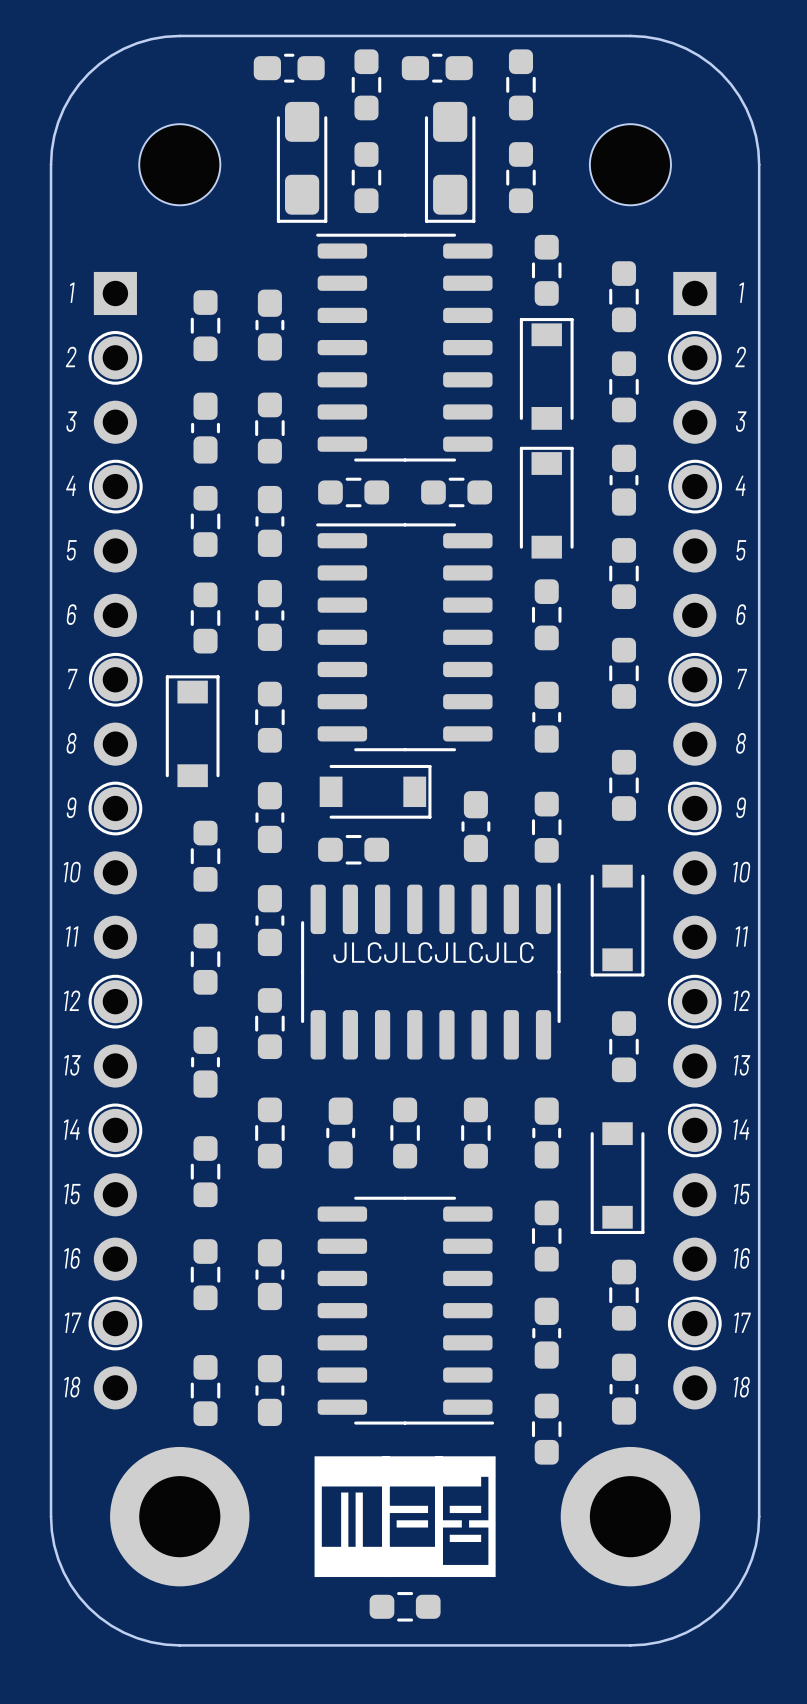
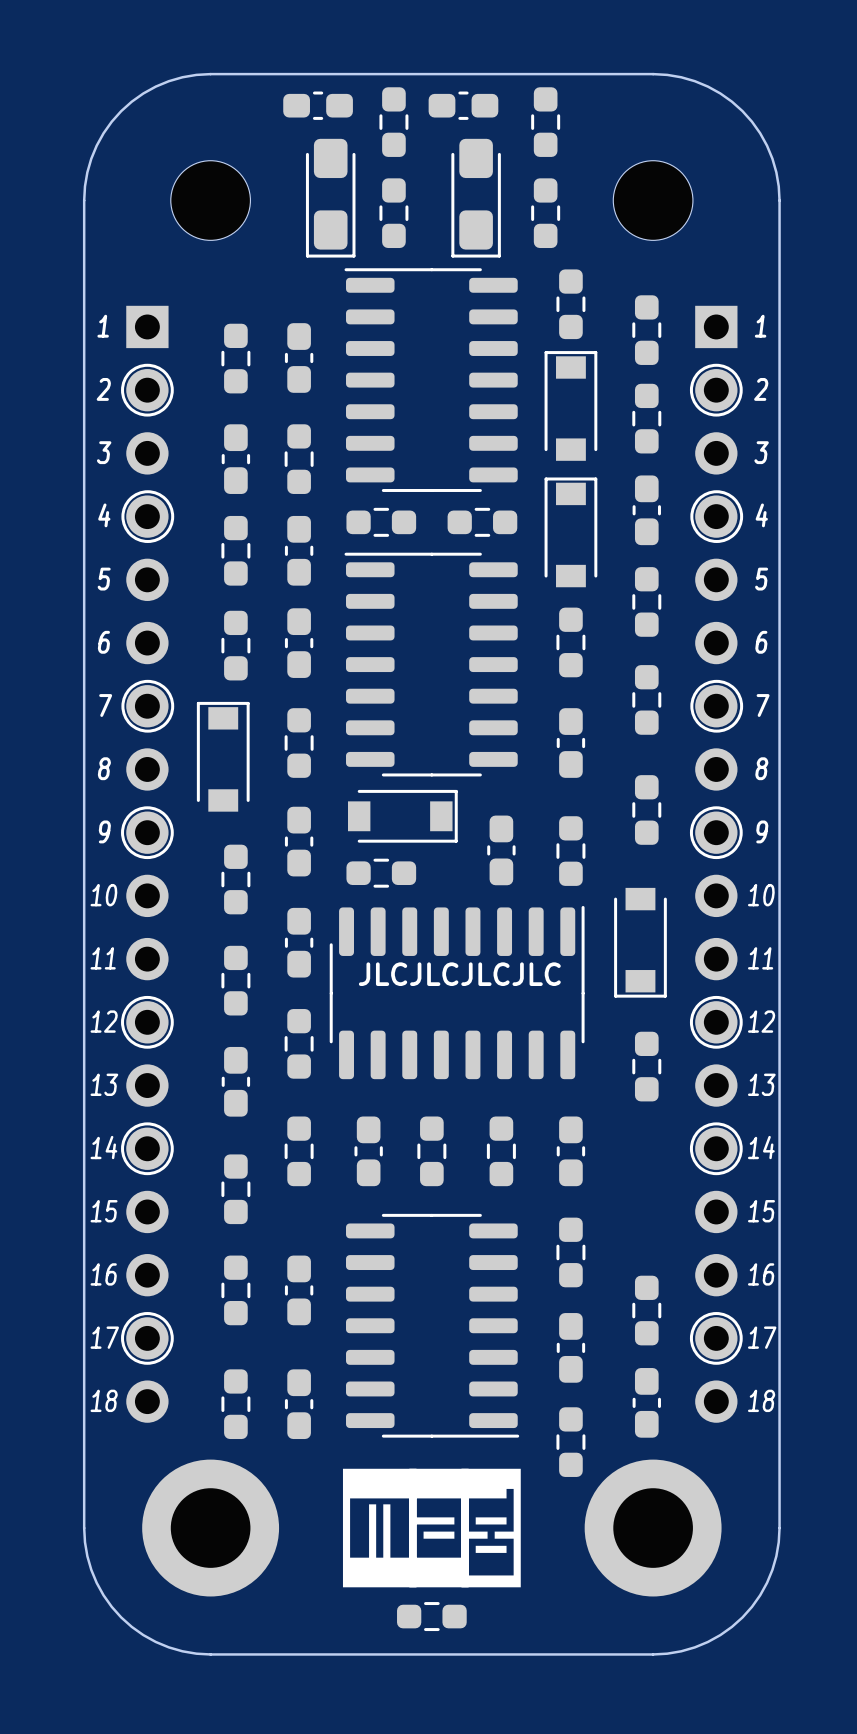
part: (617, 1178) -> none

